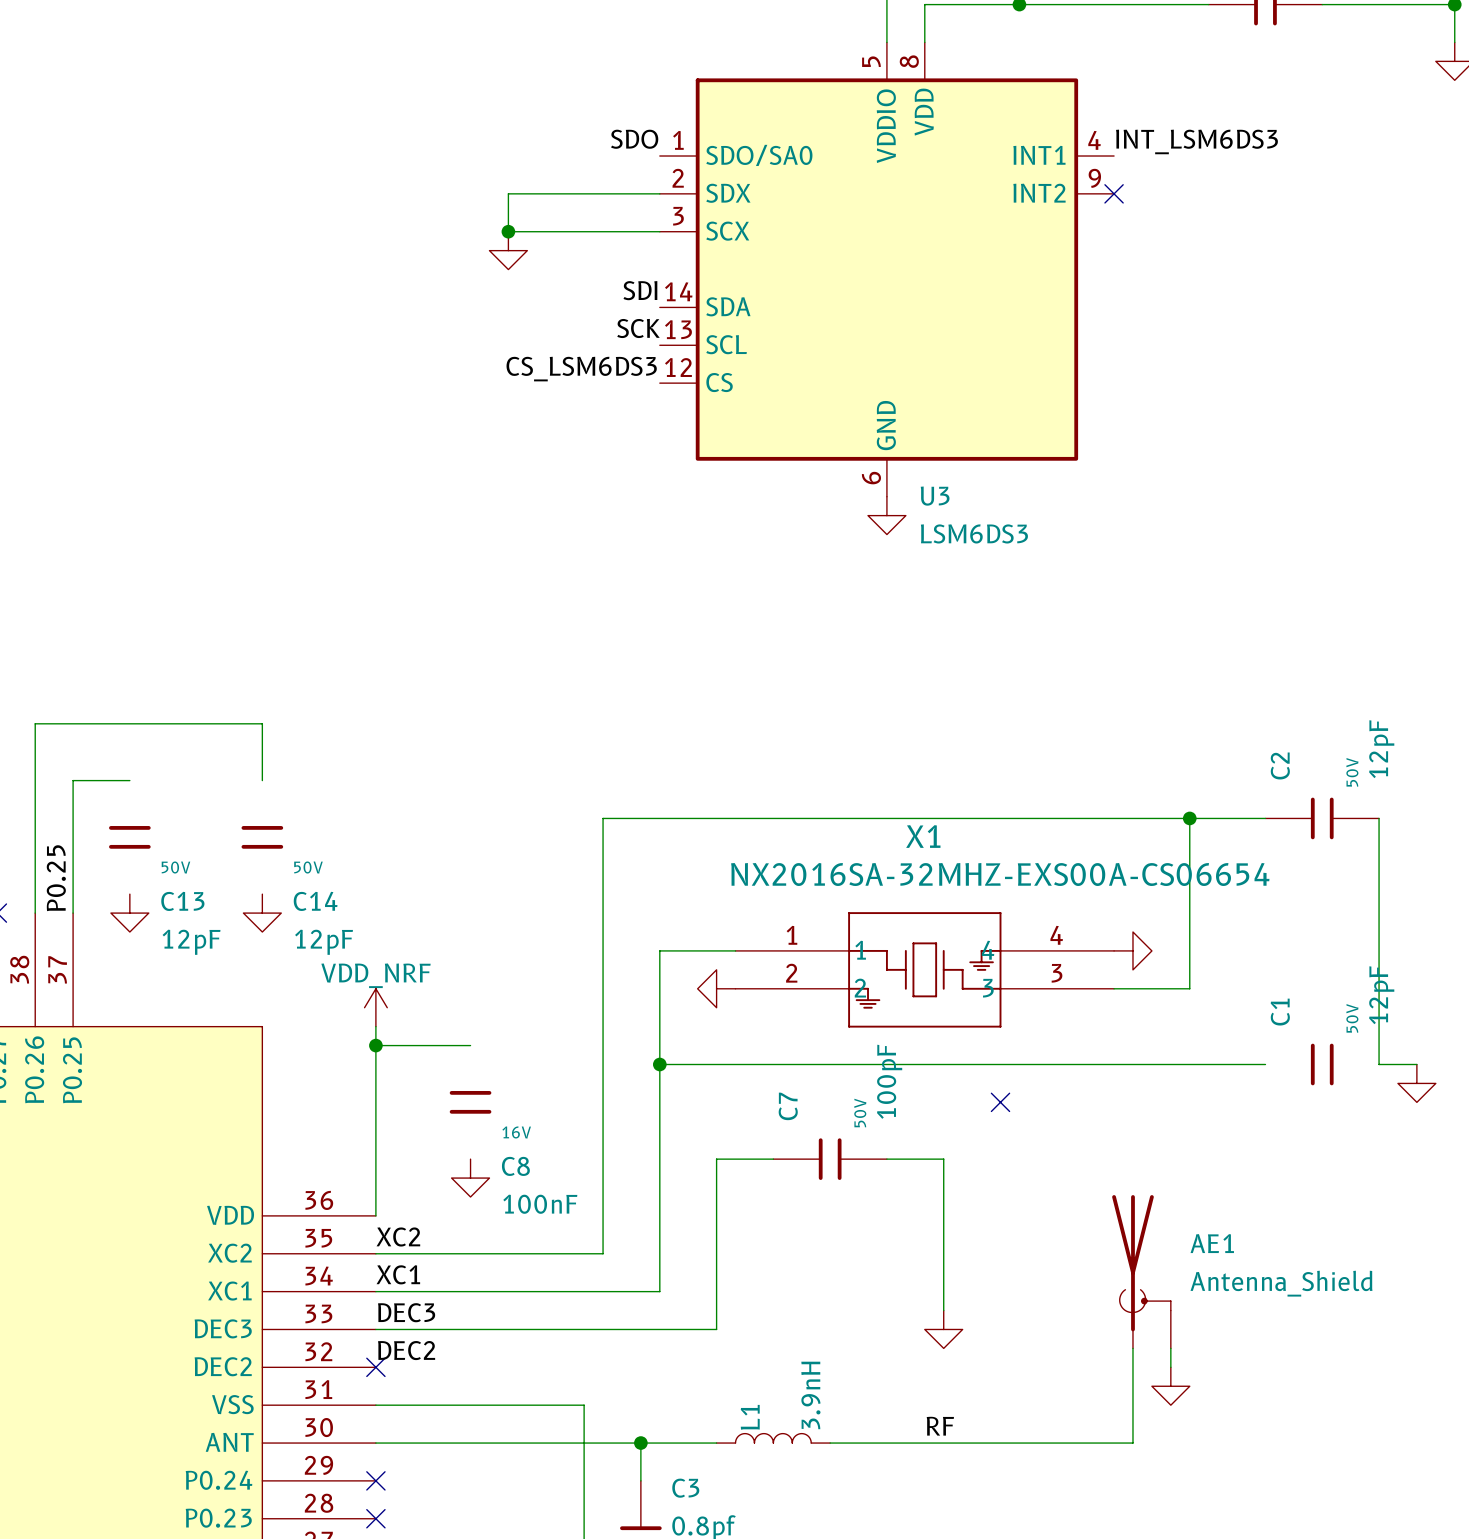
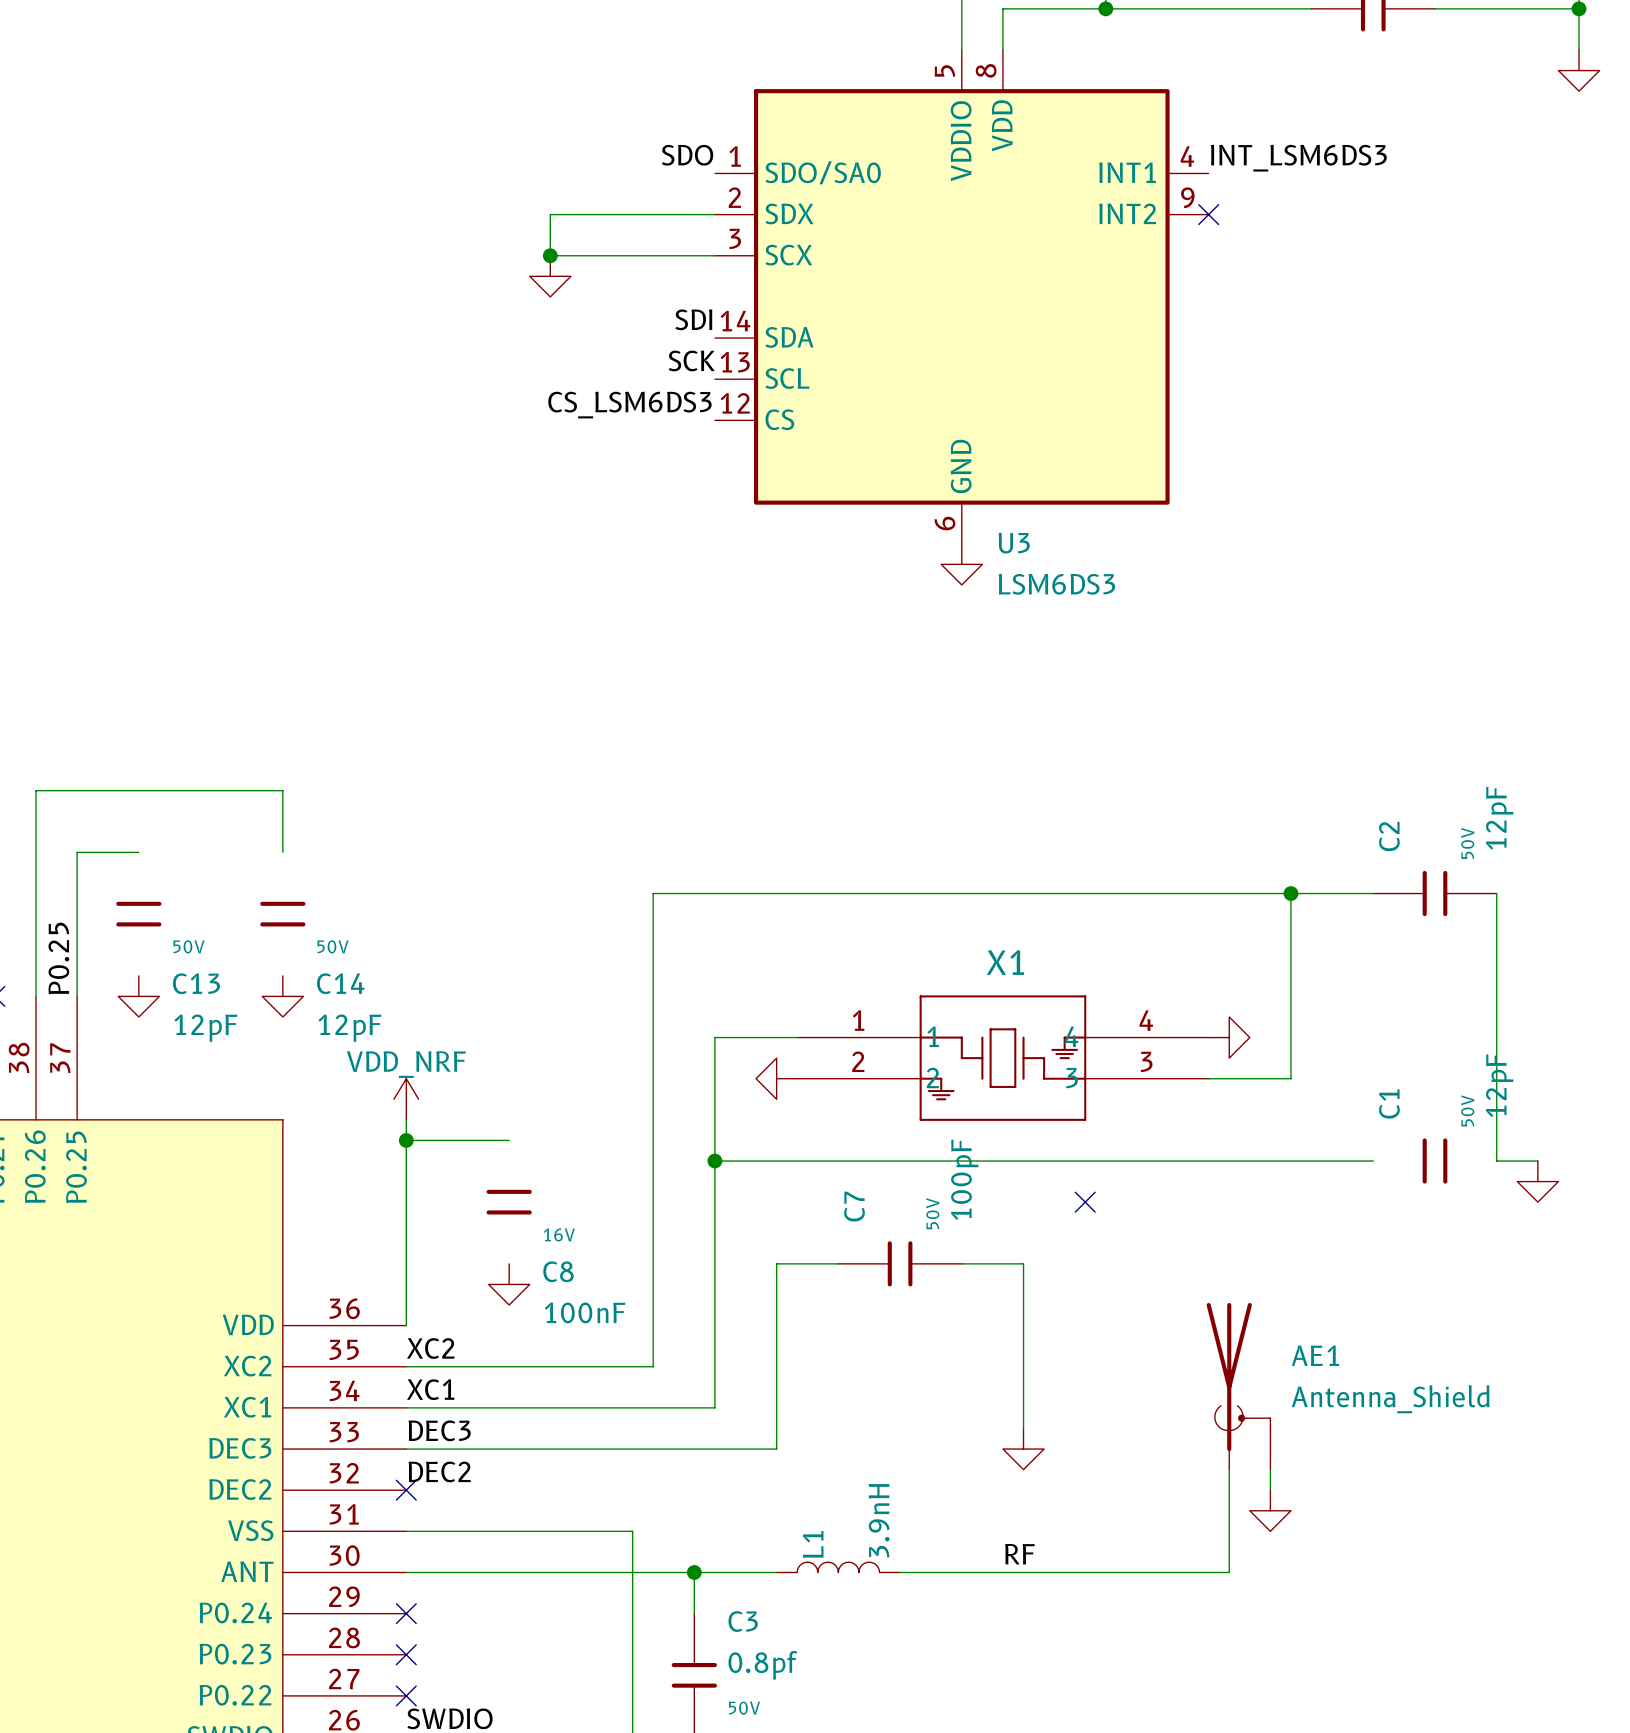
X1 name position: X1 (923, 836) -> X1 (1005, 962)
X1 value: NX2016SA-32MHZ-EXS00A-CS06654 (1000, 874) -> none

